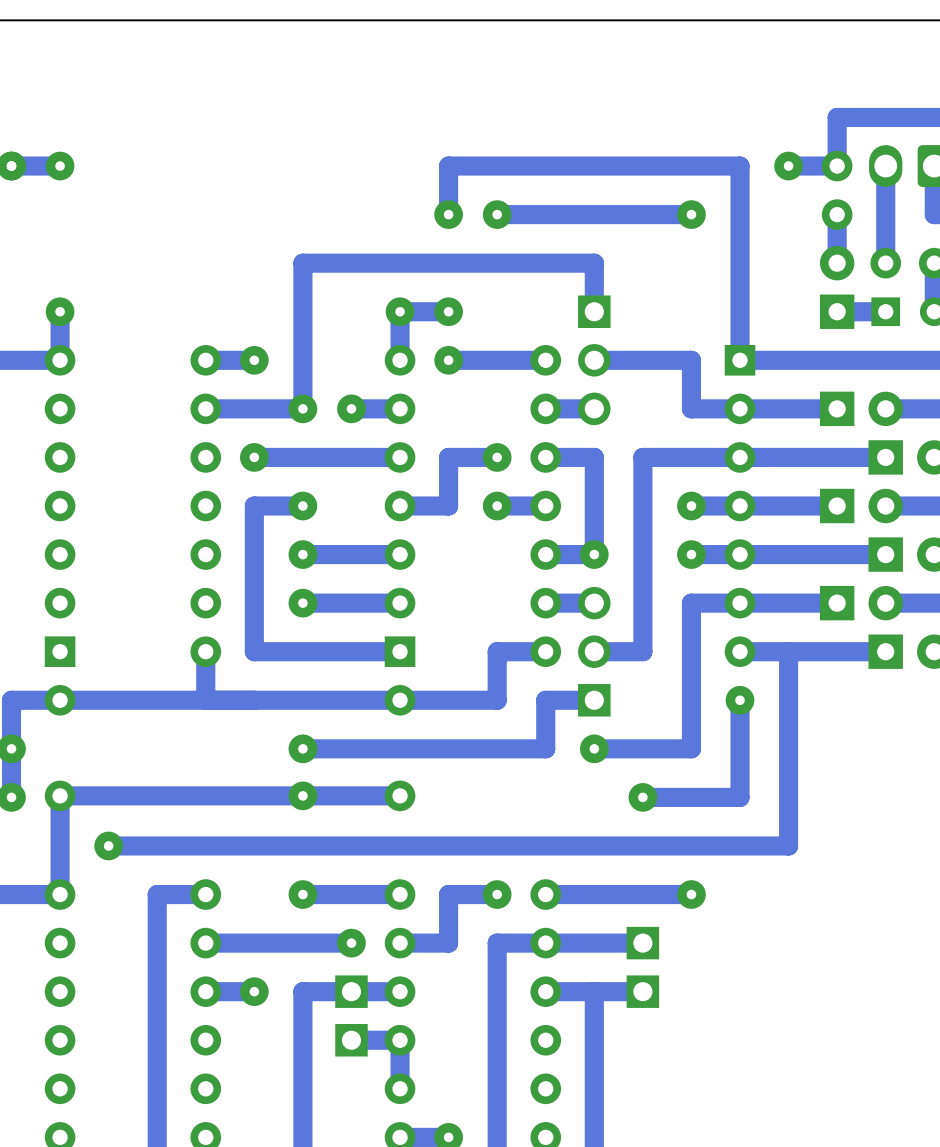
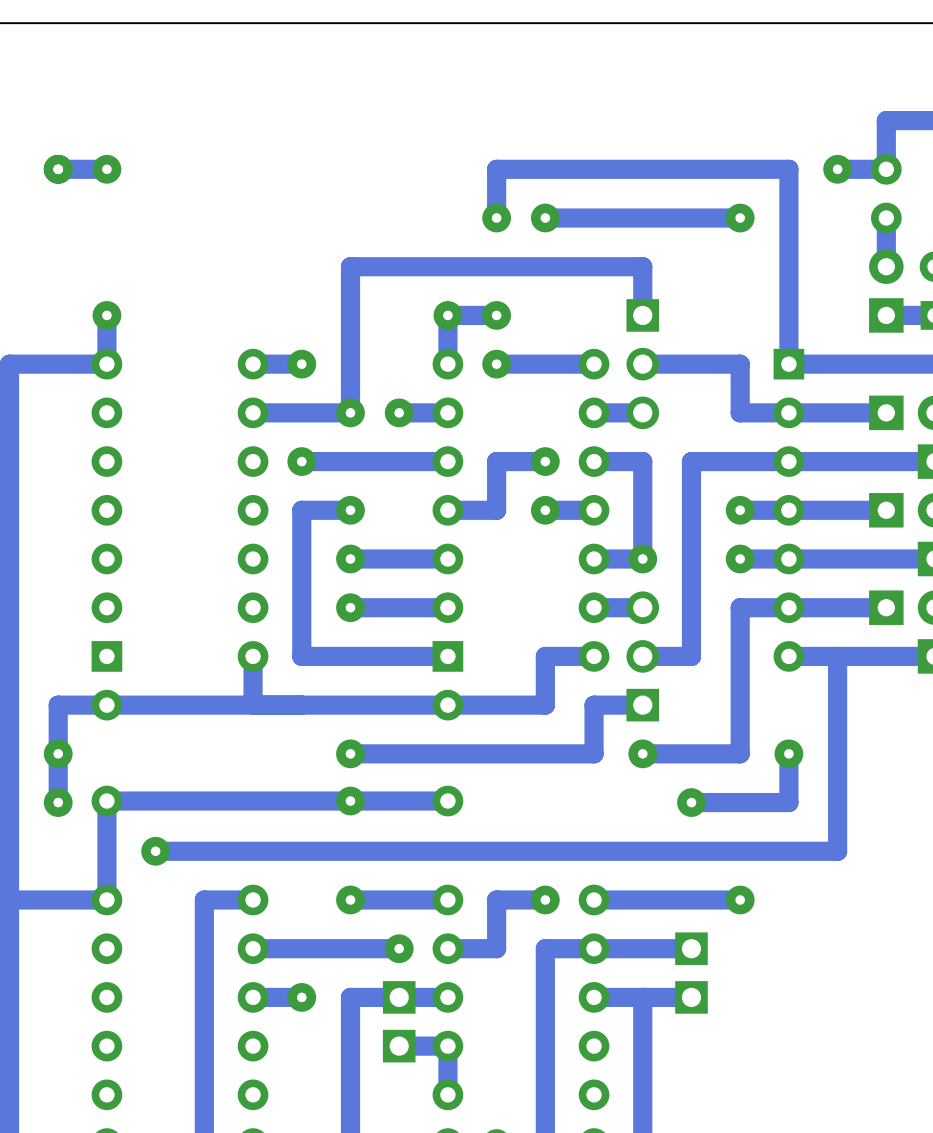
track: (740, 700) (740, 748) -> none
via position: (740, 700) -> (788, 753)

